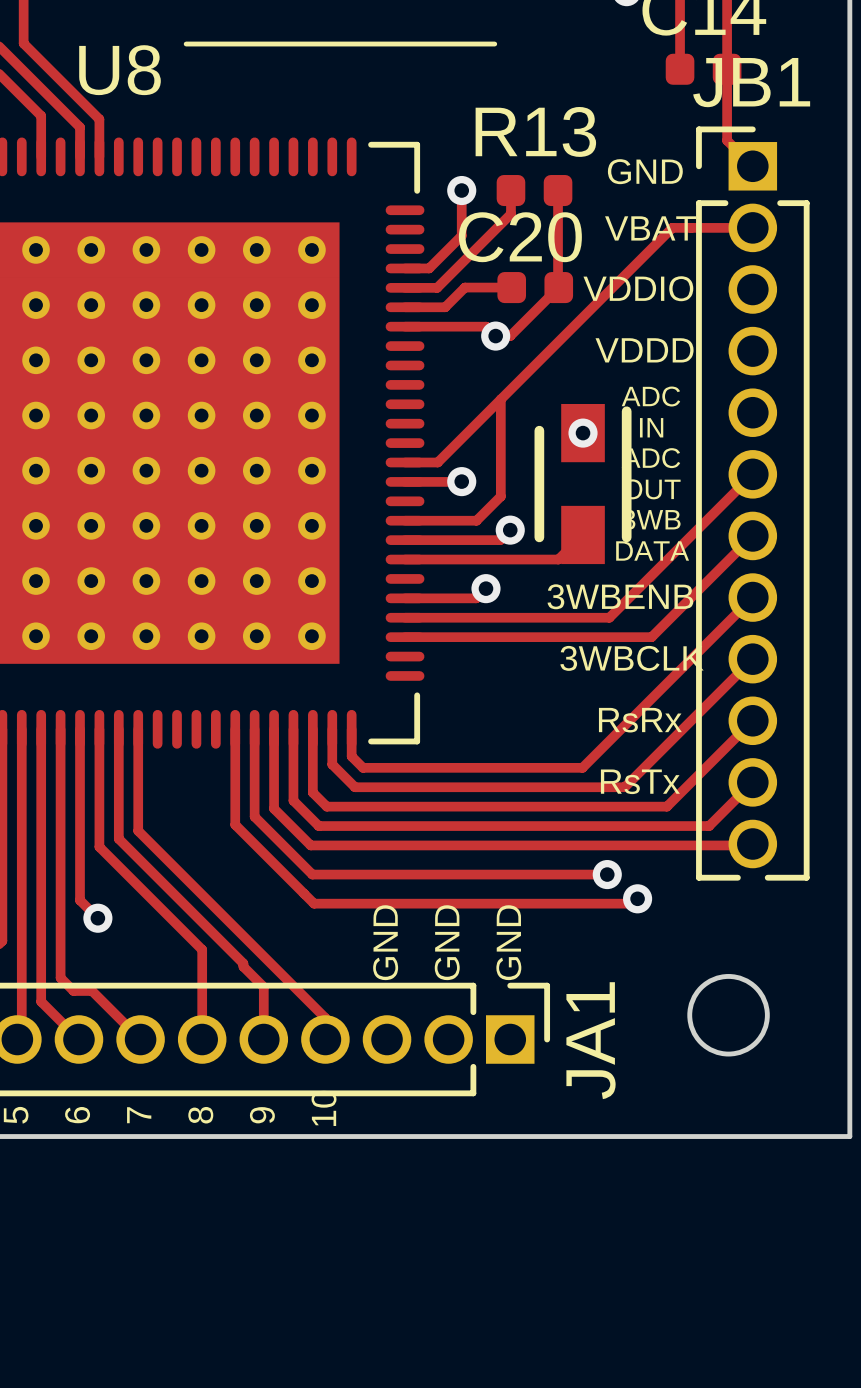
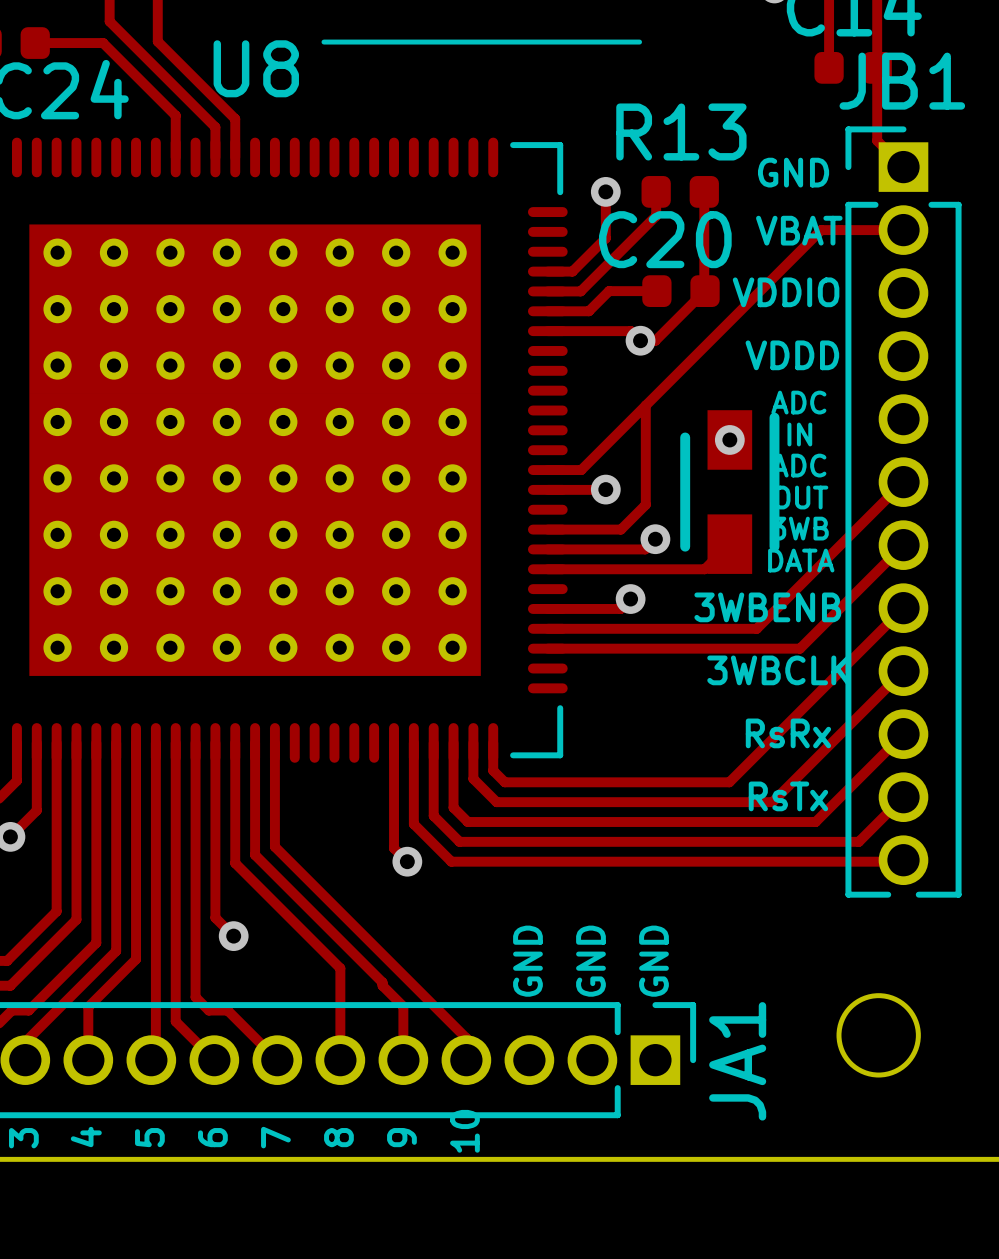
track: (235, 729) (235, 824) (314, 903) (632, 903) (637, 898) -> none
track: (254, 816) (312, 874) (607, 874) -> (394, 832) (394, 848) (407, 861)
via: none -> (407, 861)
via: (607, 874) -> none
via: (637, 898) -> none

